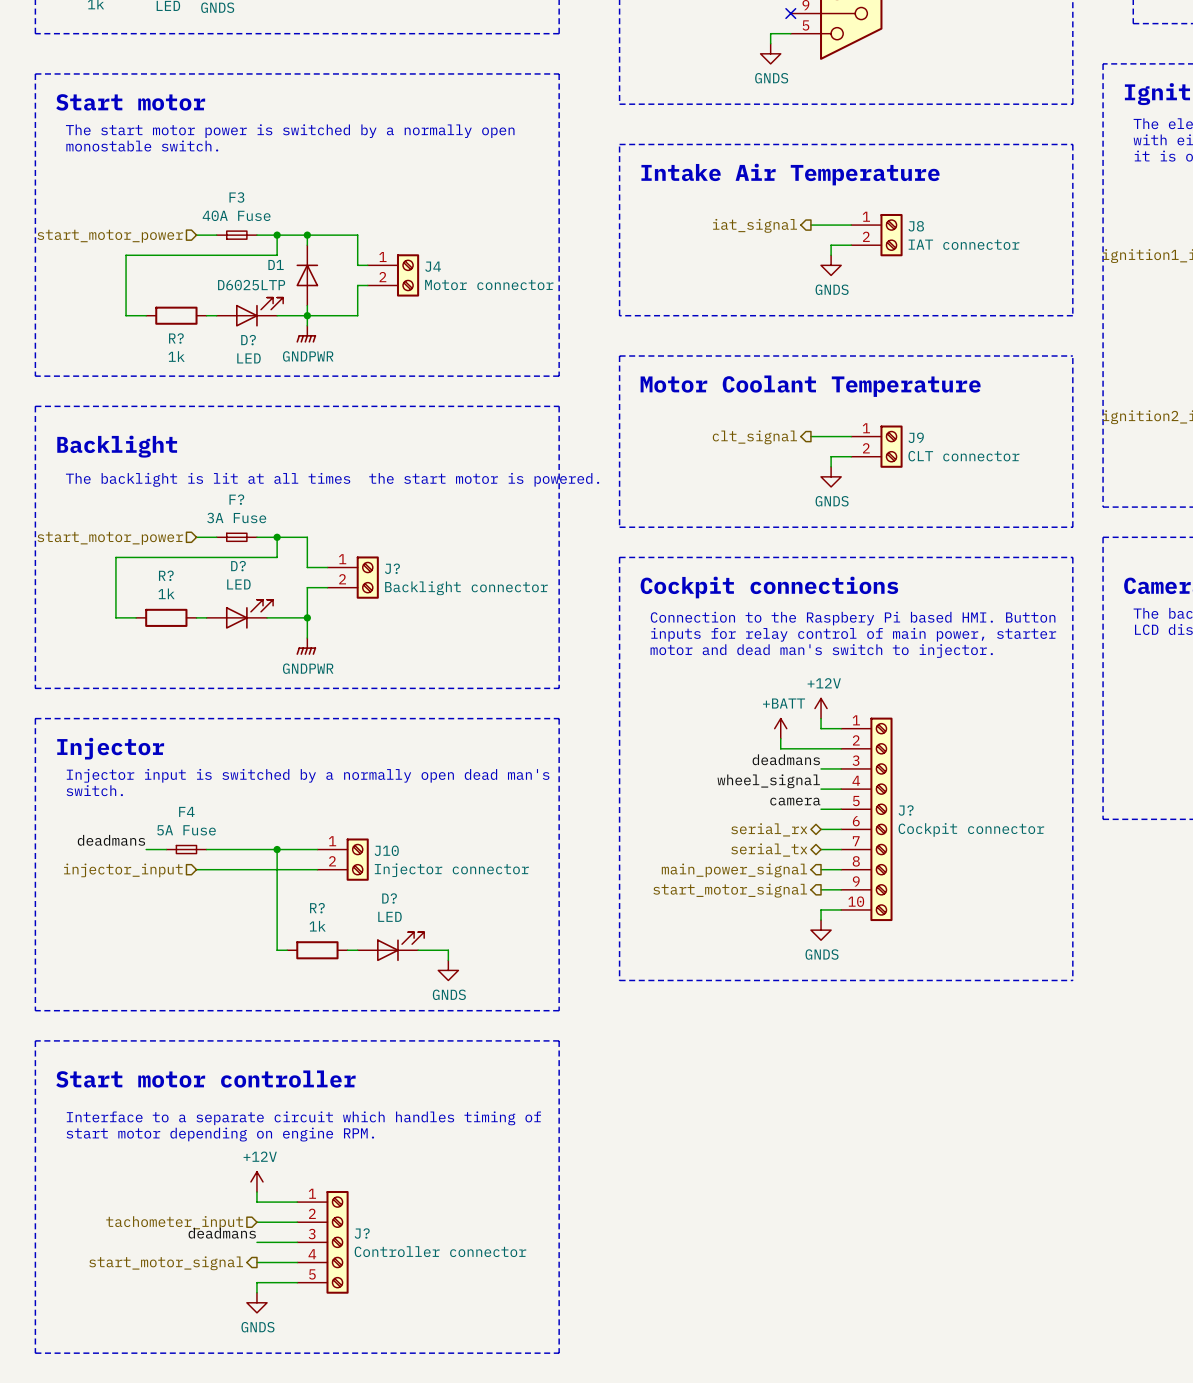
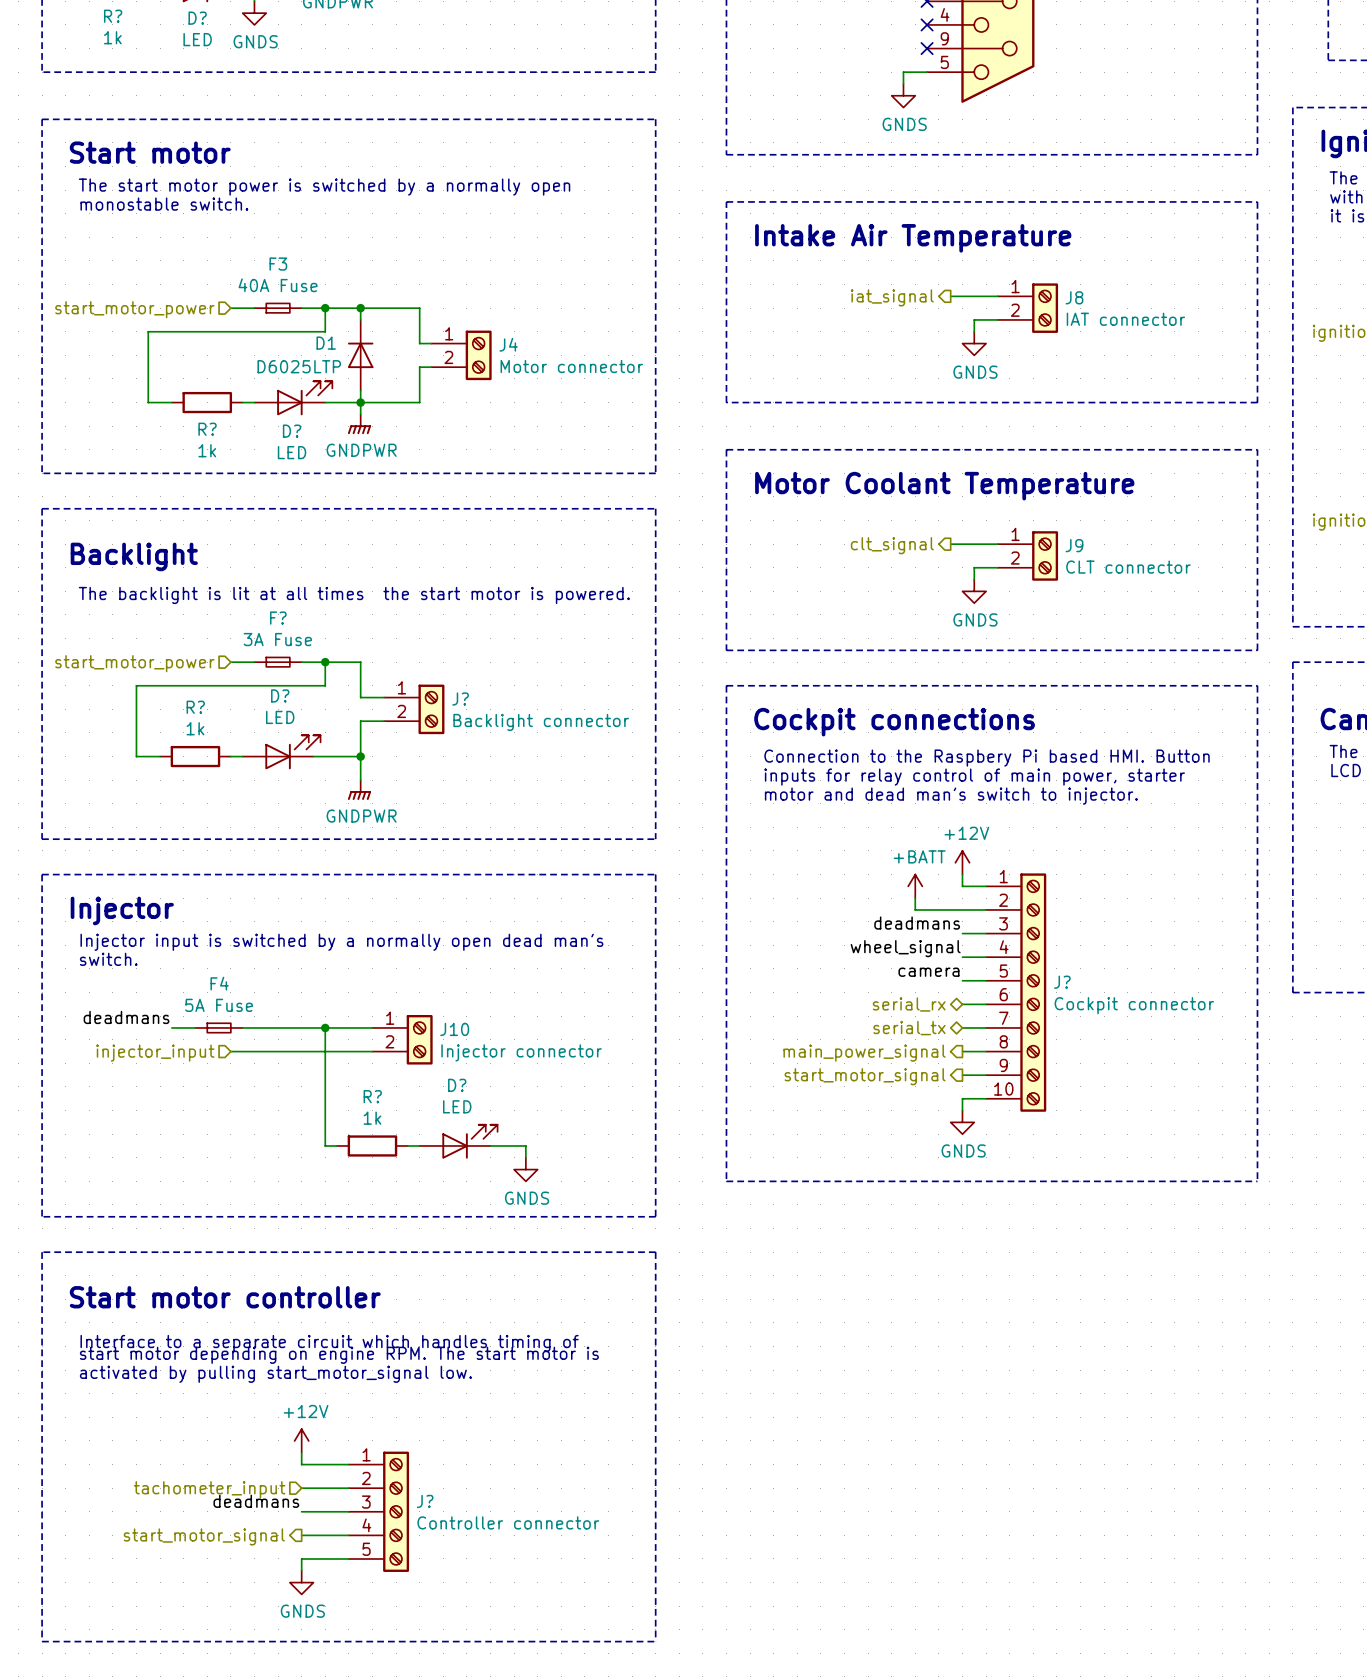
text: start motor depending on engine RPM. (220, 1134) -> start motor depending on engine RPM. The start motor is (339, 1355)
text: none -> activated by pulling start_motor_signal low. (275, 1374)
power symbol position: +12V (256, 1181) -> +12V (301, 1440)
wire: (256, 1192) (256, 1202) (297, 1202) -> none
hierarchical label position: tachometer_input (174, 1222) -> tachometer_input (209, 1489)
label position: deadmans (222, 1233) -> deadmans (256, 1501)
J? position: (322, 1242) -> (378, 1511)
hierarchical label position: start_motor_signal (166, 1263) -> start_motor_signal (204, 1536)
power symbol position: GNDS (256, 1302) -> GNDS (301, 1582)
wire: none -> (348, 1558) (301, 1558) (301, 1570)
line: (35, 1353) (559, 1353) -> (42, 1617) (42, 1641) (655, 1641) (655, 1617)

